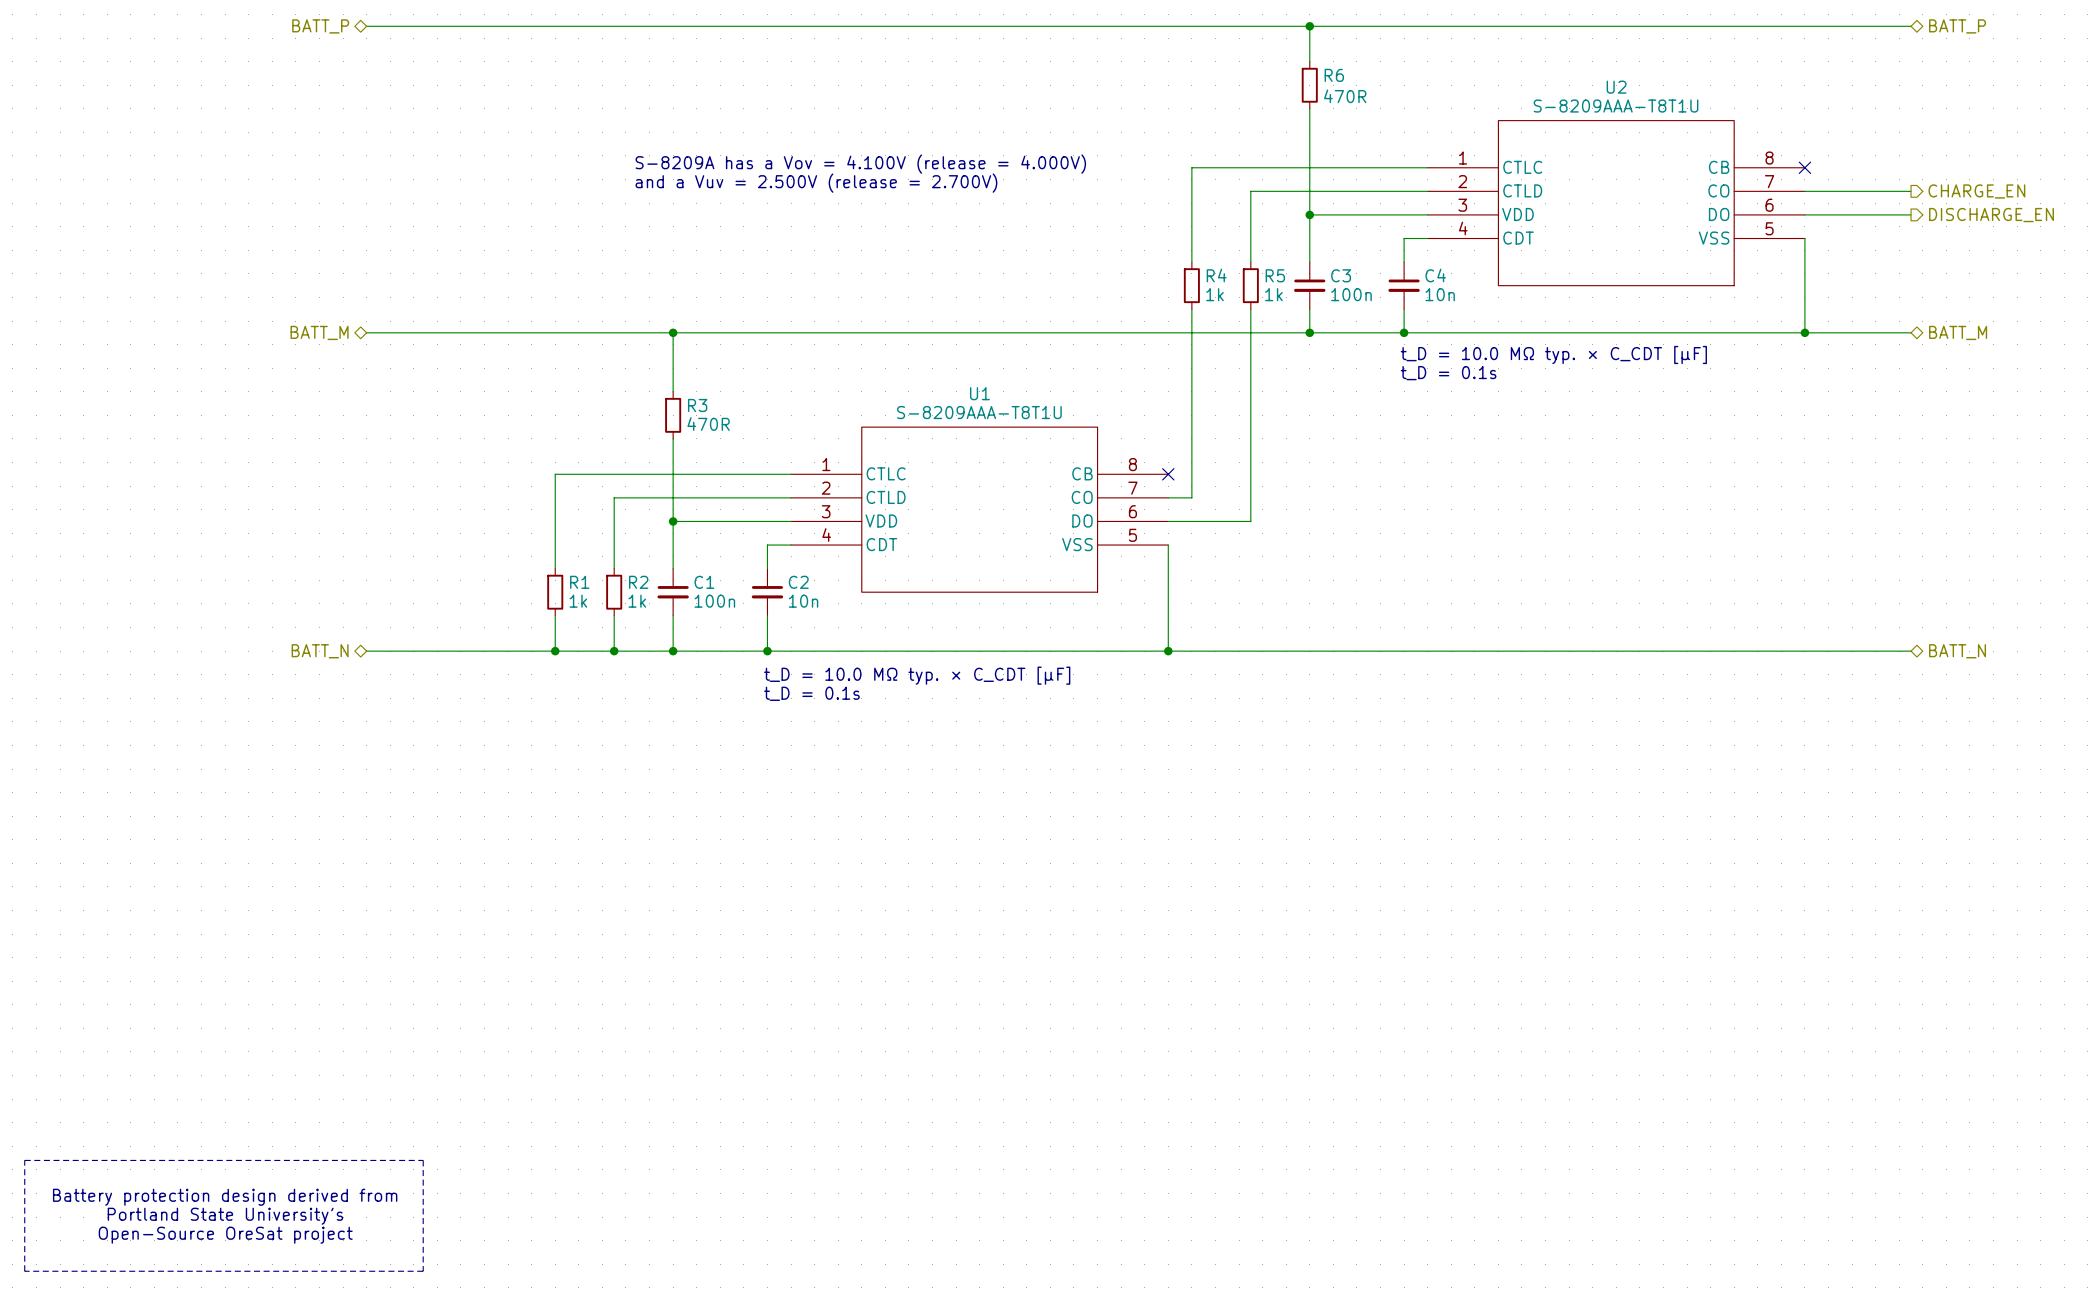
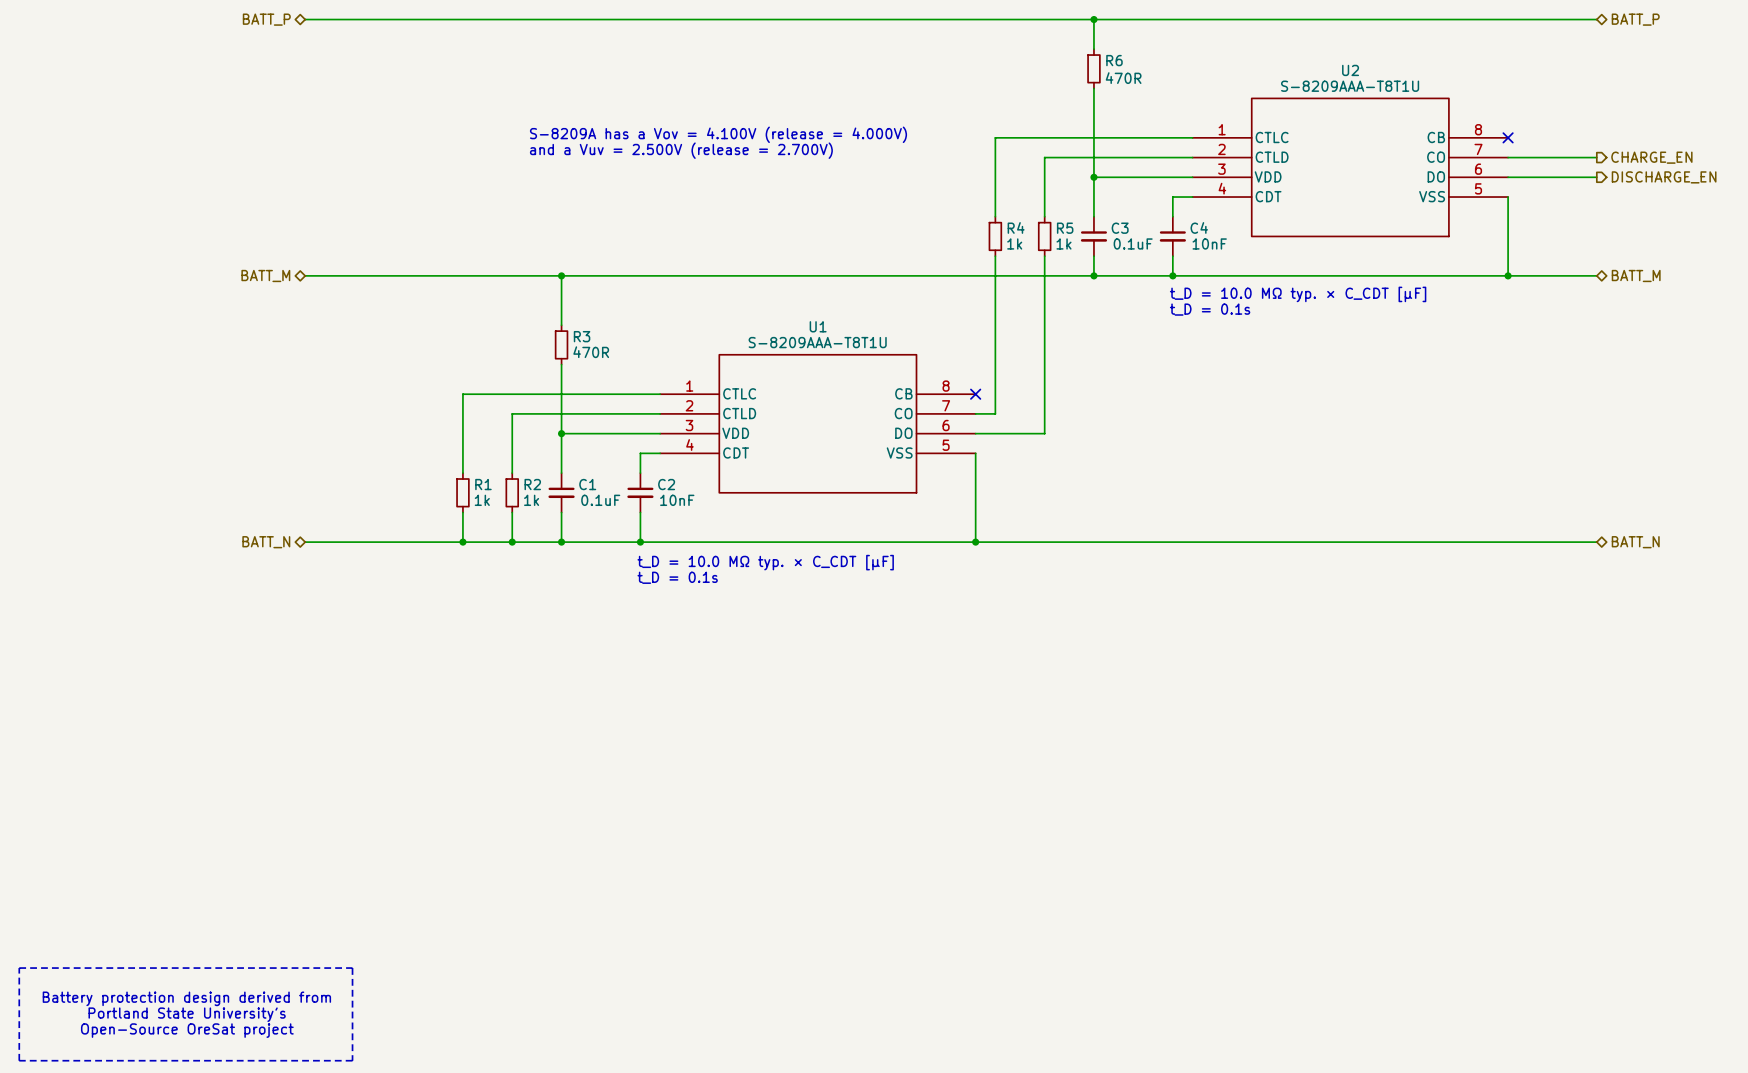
C3 value: 100n (1351, 294) -> 0.1uF (1133, 243)
C4 value: 10n (1440, 294) -> 10nF (1209, 243)
C1 value: 100n (714, 601) -> 0.1uF (600, 500)
C2 value: 10n (803, 601) -> 10nF (677, 500)

